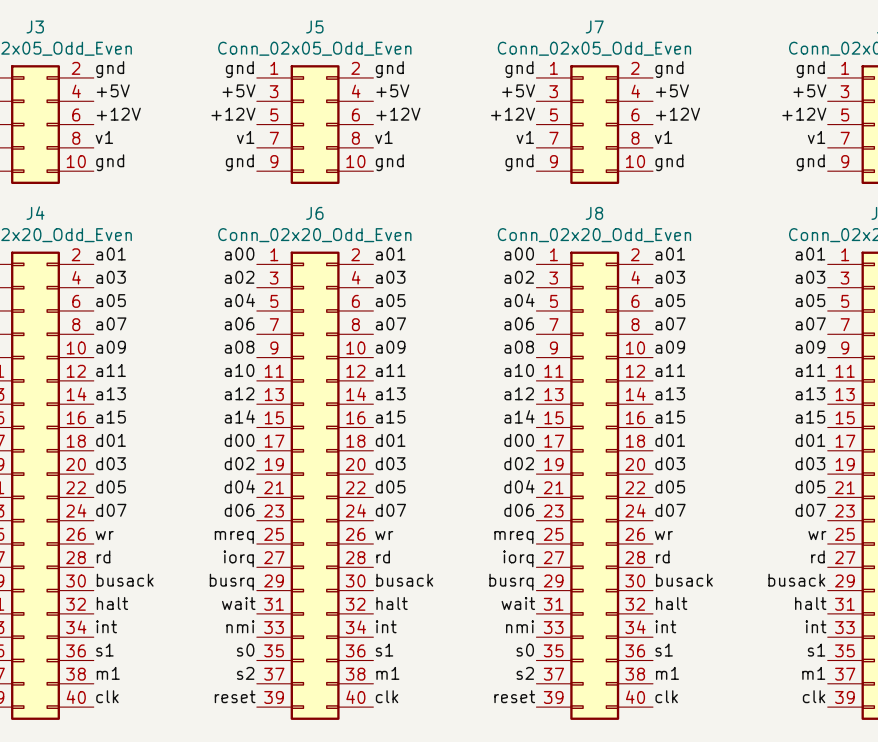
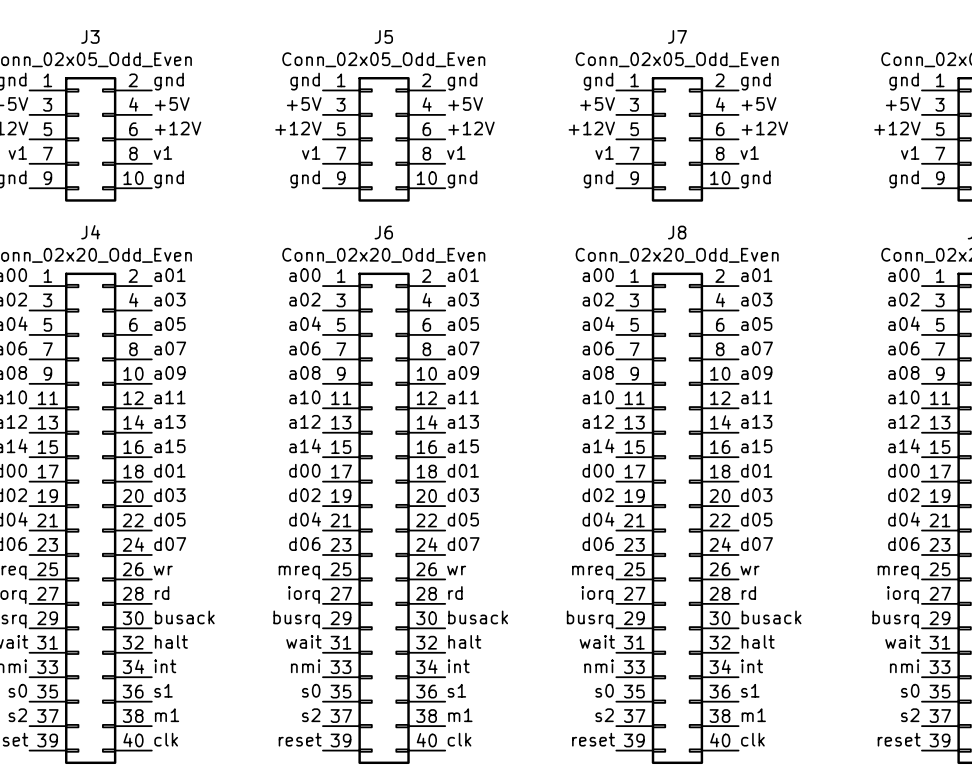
label: a01 (810, 253) -> a00 (903, 275)
label: a03 (810, 277) -> a02 (903, 299)
label: a05 (810, 300) -> a04 (904, 323)
label: a07 (810, 323) -> a06 (903, 348)
label: a09 (810, 347) -> a08 (903, 372)
label: a11 (810, 370) -> a10 (903, 397)
label: a13 (810, 393) -> a12 (903, 421)
label: a15 (810, 417) -> a14 (904, 445)
label: d01 (810, 440) -> d00 (903, 470)
label: d03 (810, 463) -> d02 (903, 495)
label: d05 (810, 486) -> d04 (904, 519)
label: d07 (810, 510) -> d06 (903, 544)
label: wr (817, 535) -> mreq (898, 572)
label: rd (817, 556) -> iorq (902, 595)
label: busack (796, 580) -> busrq (895, 619)
label: halt (810, 603) -> wait (902, 641)
label: int (815, 626) -> nmi (904, 666)
label: s1 (816, 650) -> s0 (910, 690)
label: m1 (813, 673) -> s2 (910, 715)
label: clk (814, 696) -> reset (899, 739)

